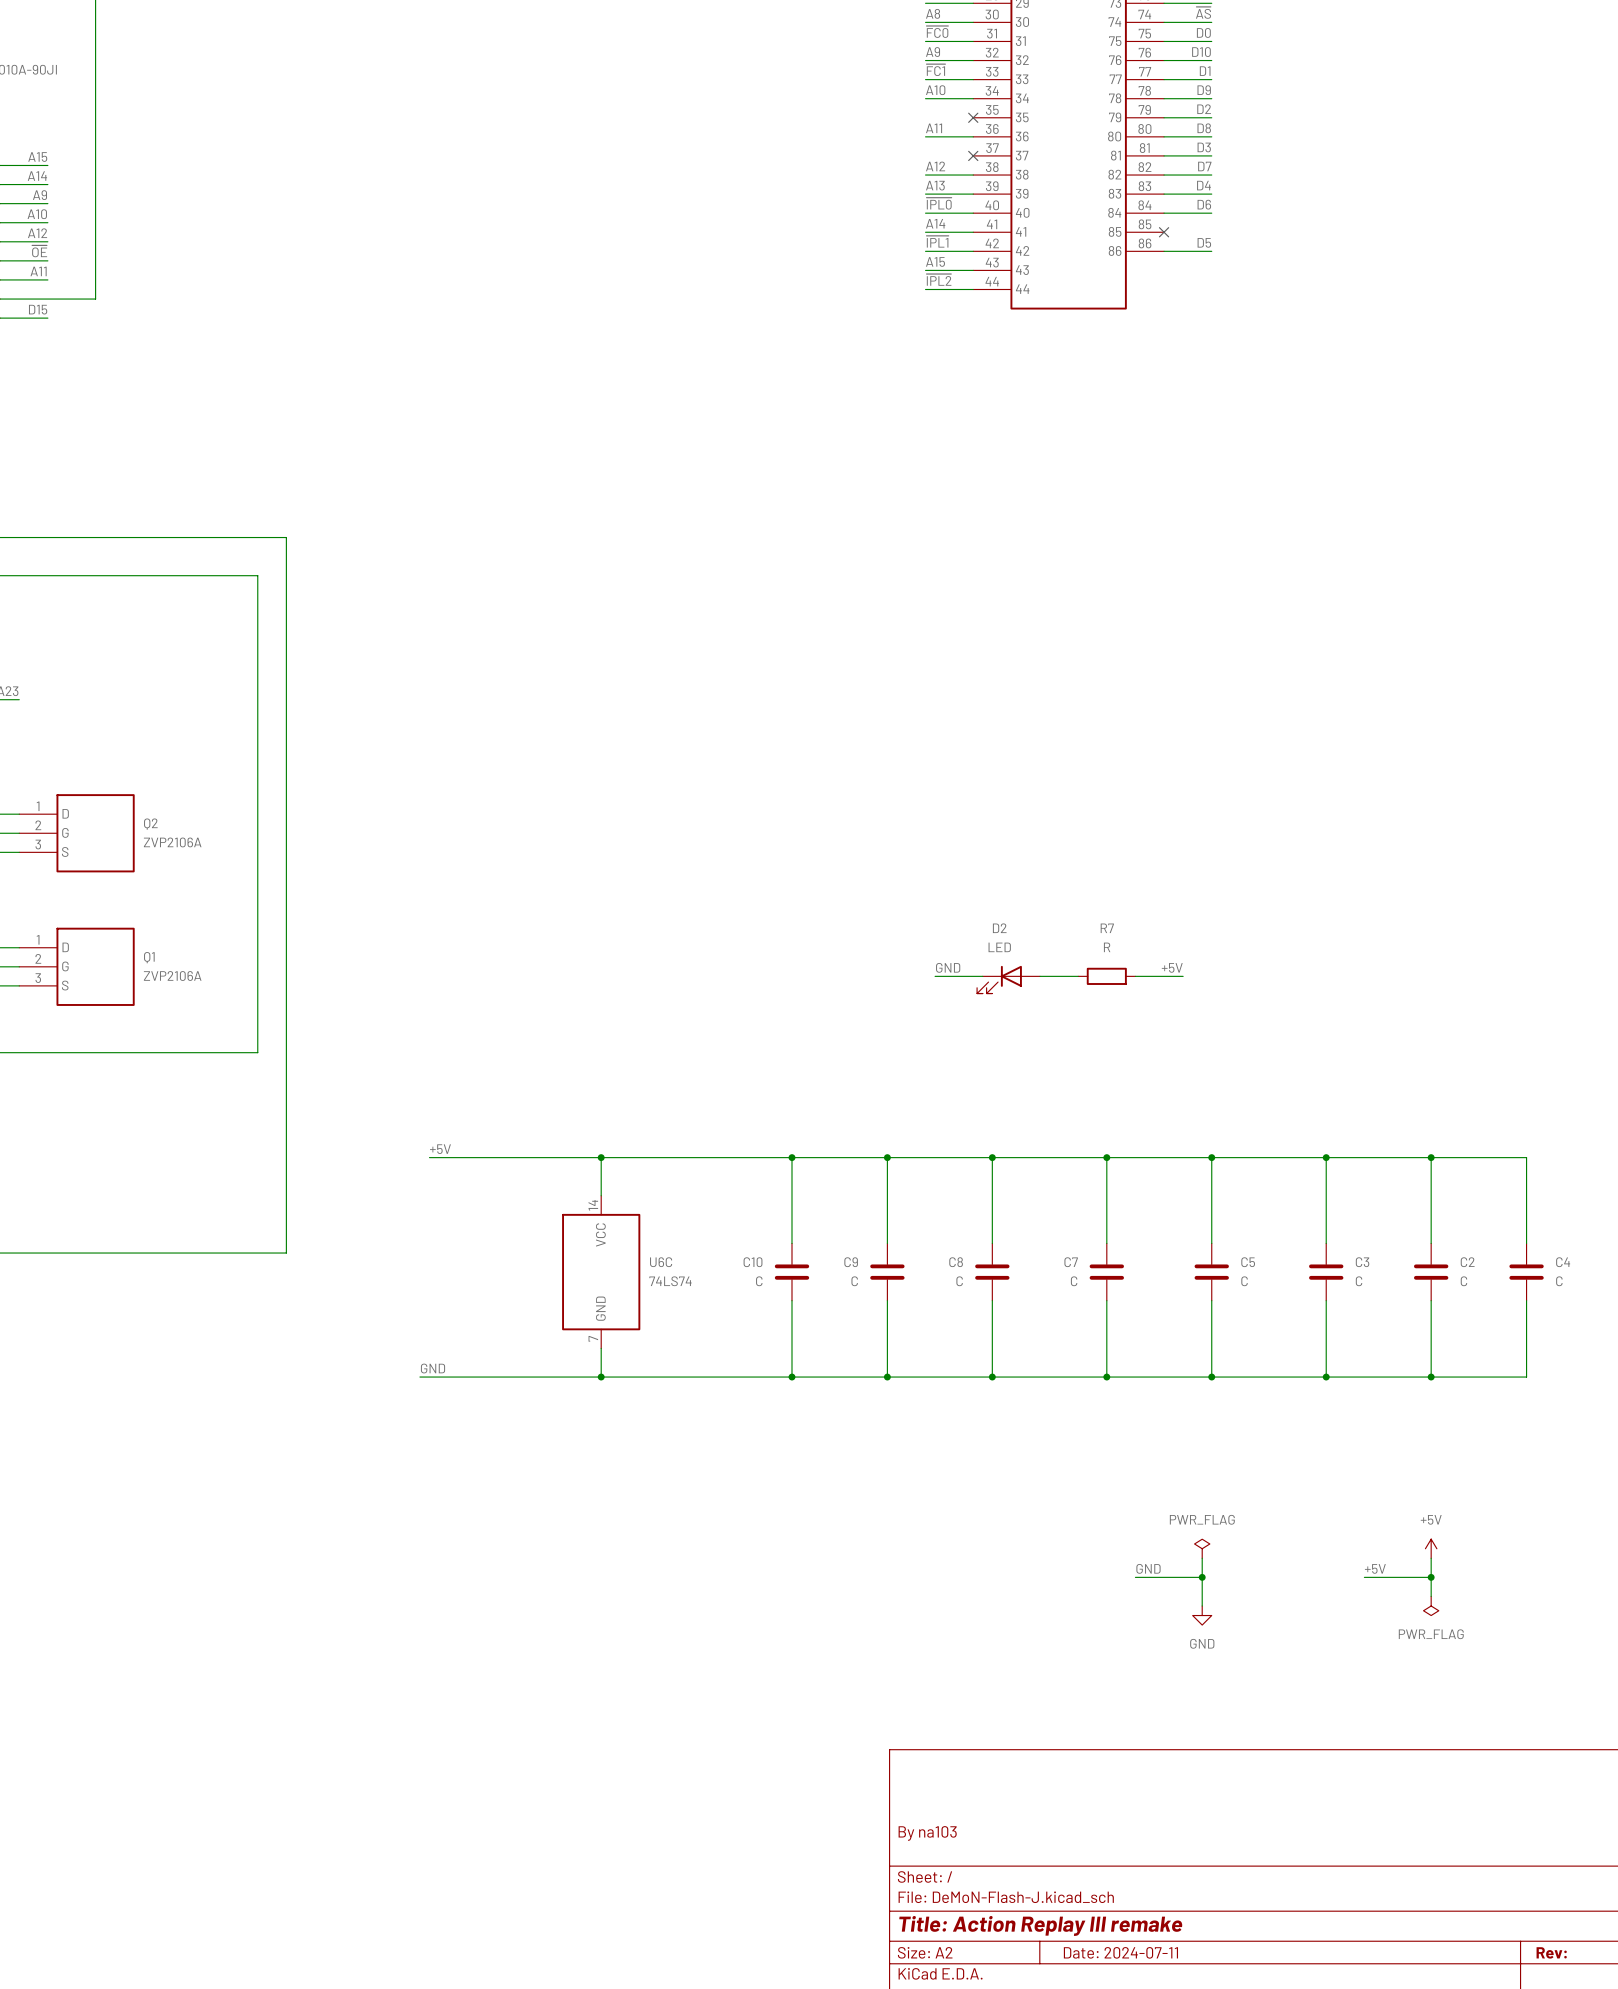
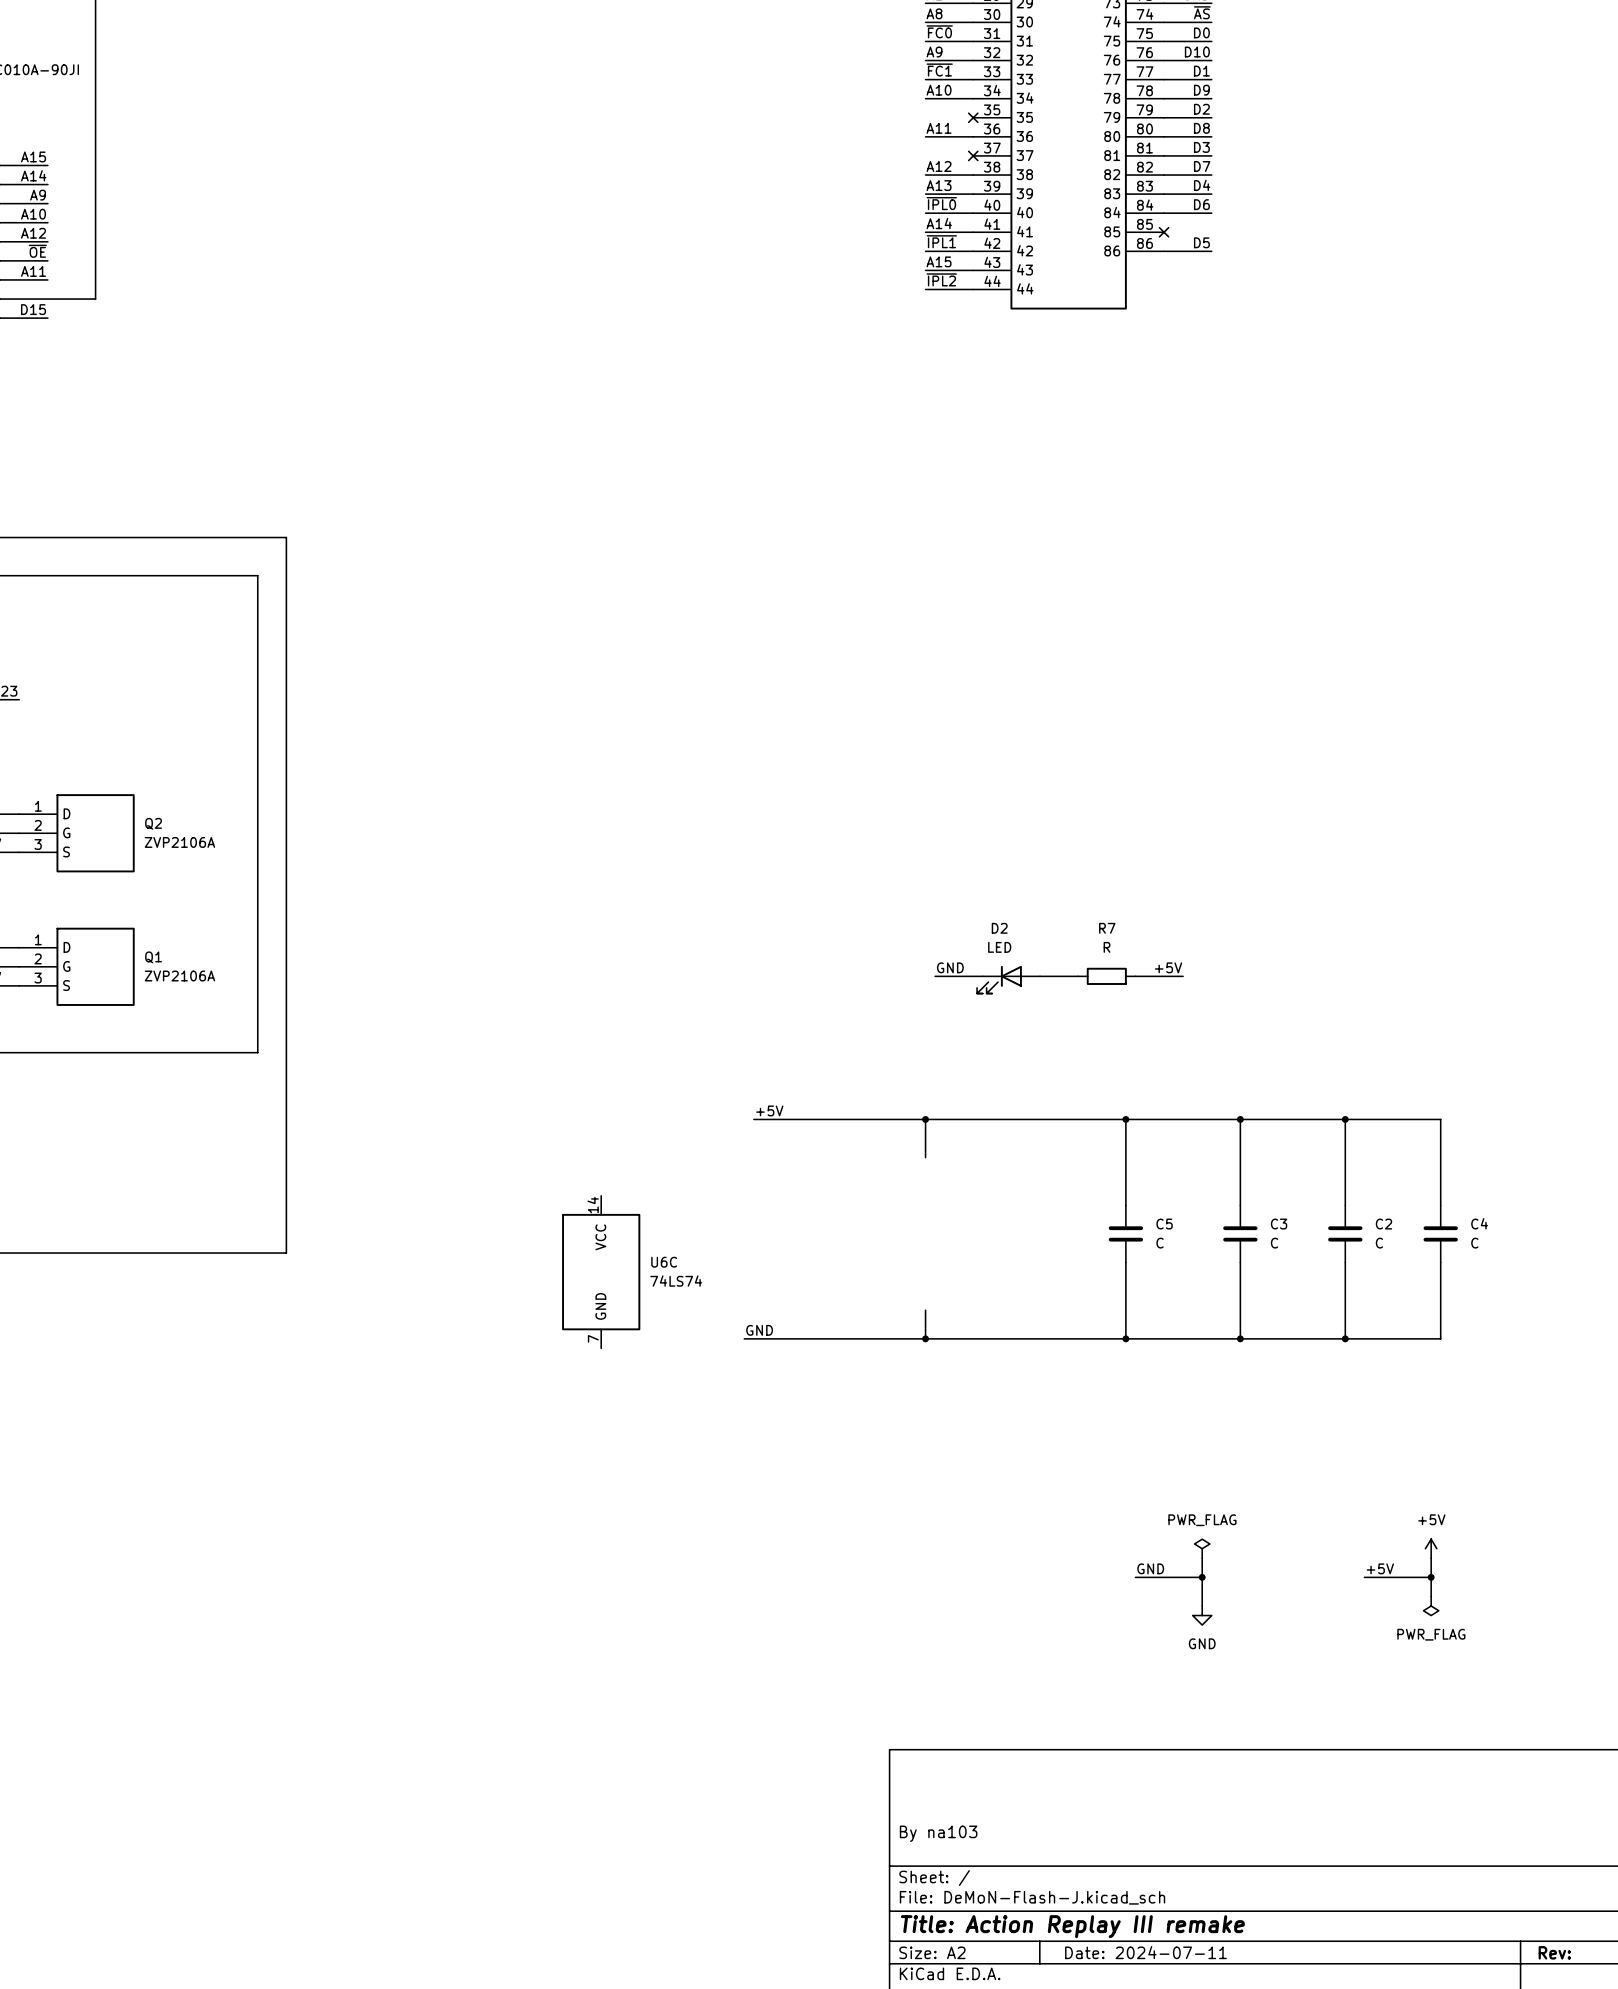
label: none -> +5V (769, 1110)
wire: none -> (753, 1119) (1440, 1119) (1440, 1205)
wire: none -> (925, 1119) (925, 1157)
junction: none -> (925, 1119)
junction: none -> (1240, 1119)
label: +5V (440, 1149) -> none
wire: (429, 1157) (1526, 1157) (1526, 1243) -> none
wire: (601, 1157) (601, 1195) -> none
junction: (601, 1157) -> none
wire: (791, 1157) (791, 1243) -> none
junction: (791, 1157) -> none
wire: (887, 1157) (887, 1243) -> none
junction: (887, 1157) -> none
wire: (992, 1157) (992, 1243) -> none
junction: (992, 1157) -> none
wire: (1106, 1157) (1106, 1243) -> none
junction position: (1106, 1157) -> (1125, 1119)
wire: (1211, 1157) (1211, 1243) -> (1125, 1119) (1125, 1205)
junction: (1211, 1157) -> none
wire: (1326, 1157) (1326, 1243) -> (1240, 1119) (1240, 1205)
junction position: (1326, 1157) -> (1345, 1119)
wire: (1431, 1157) (1431, 1243) -> (1345, 1119) (1345, 1205)
junction: (1431, 1157) -> none
wire: none -> (1440, 1262) (1440, 1338) (744, 1338)
C10: C (791, 1272) -> none
C9: C (887, 1272) -> none
C8: C (992, 1272) -> none
C7: C (1106, 1272) -> none
C5 position: (1211, 1272) -> (1125, 1233)
C3 position: (1326, 1272) -> (1240, 1233)
C2 position: (1431, 1272) -> (1345, 1233)
C4 position: (1526, 1272) -> (1440, 1233)
wire: (791, 1300) (791, 1377) -> none
wire: (887, 1300) (887, 1377) -> none
wire: (992, 1300) (992, 1377) -> none
wire: (1106, 1300) (1106, 1377) -> none
wire: (1211, 1300) (1211, 1377) -> (1125, 1262) (1125, 1338)
wire: (1326, 1300) (1326, 1377) -> (1240, 1262) (1240, 1338)
wire: (1431, 1300) (1431, 1377) -> (1345, 1262) (1345, 1338)
wire: (1526, 1300) (1526, 1377) (419, 1377) -> none
wire: none -> (925, 1310) (925, 1338)
label: none -> GND (759, 1330)
junction: none -> (925, 1338)
junction: none -> (1240, 1338)
wire: (601, 1348) (601, 1377) -> none
label: GND (433, 1368) -> none
junction: (601, 1377) -> none
junction: (791, 1377) -> none
junction: (887, 1377) -> none
junction: (992, 1377) -> none
junction position: (1106, 1377) -> (1125, 1338)
junction: (1211, 1377) -> none
junction position: (1326, 1377) -> (1345, 1338)
junction: (1431, 1377) -> none

